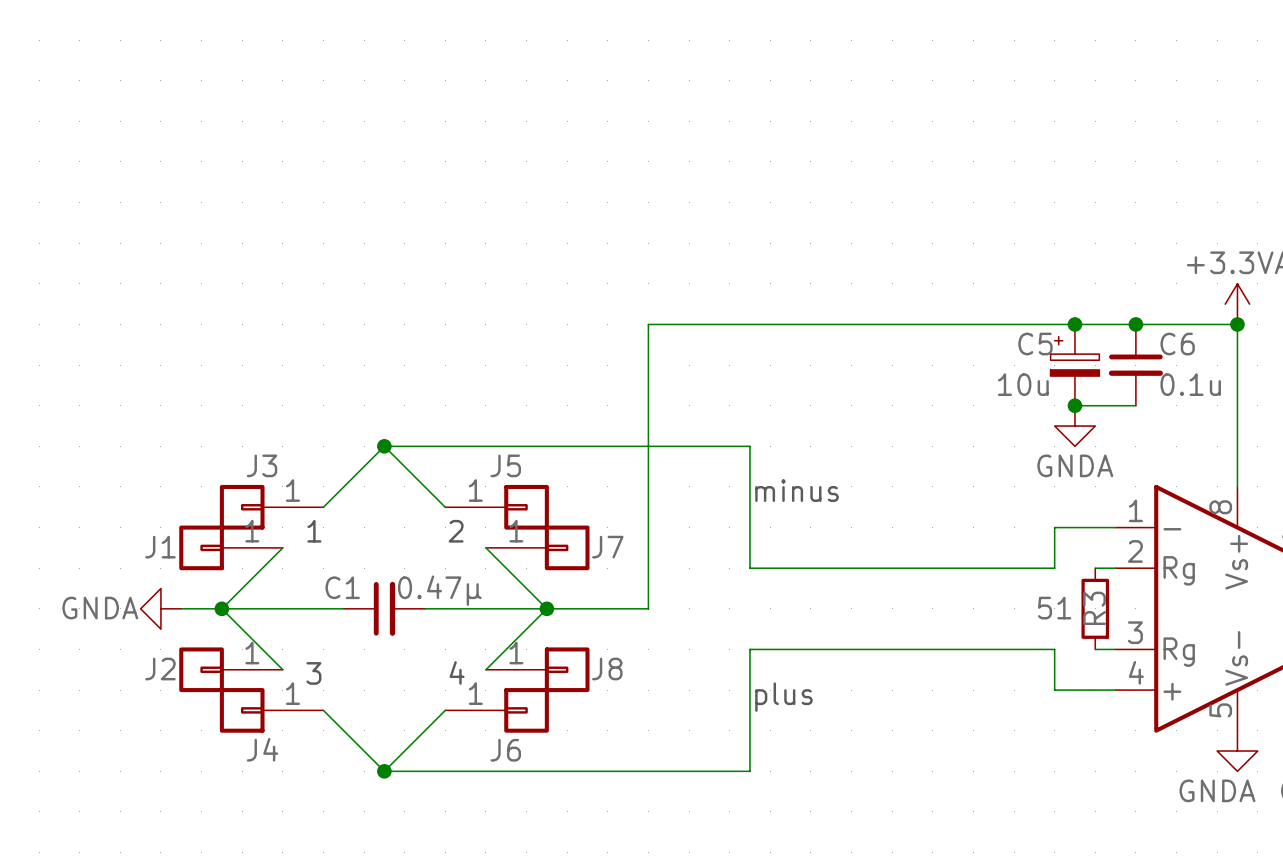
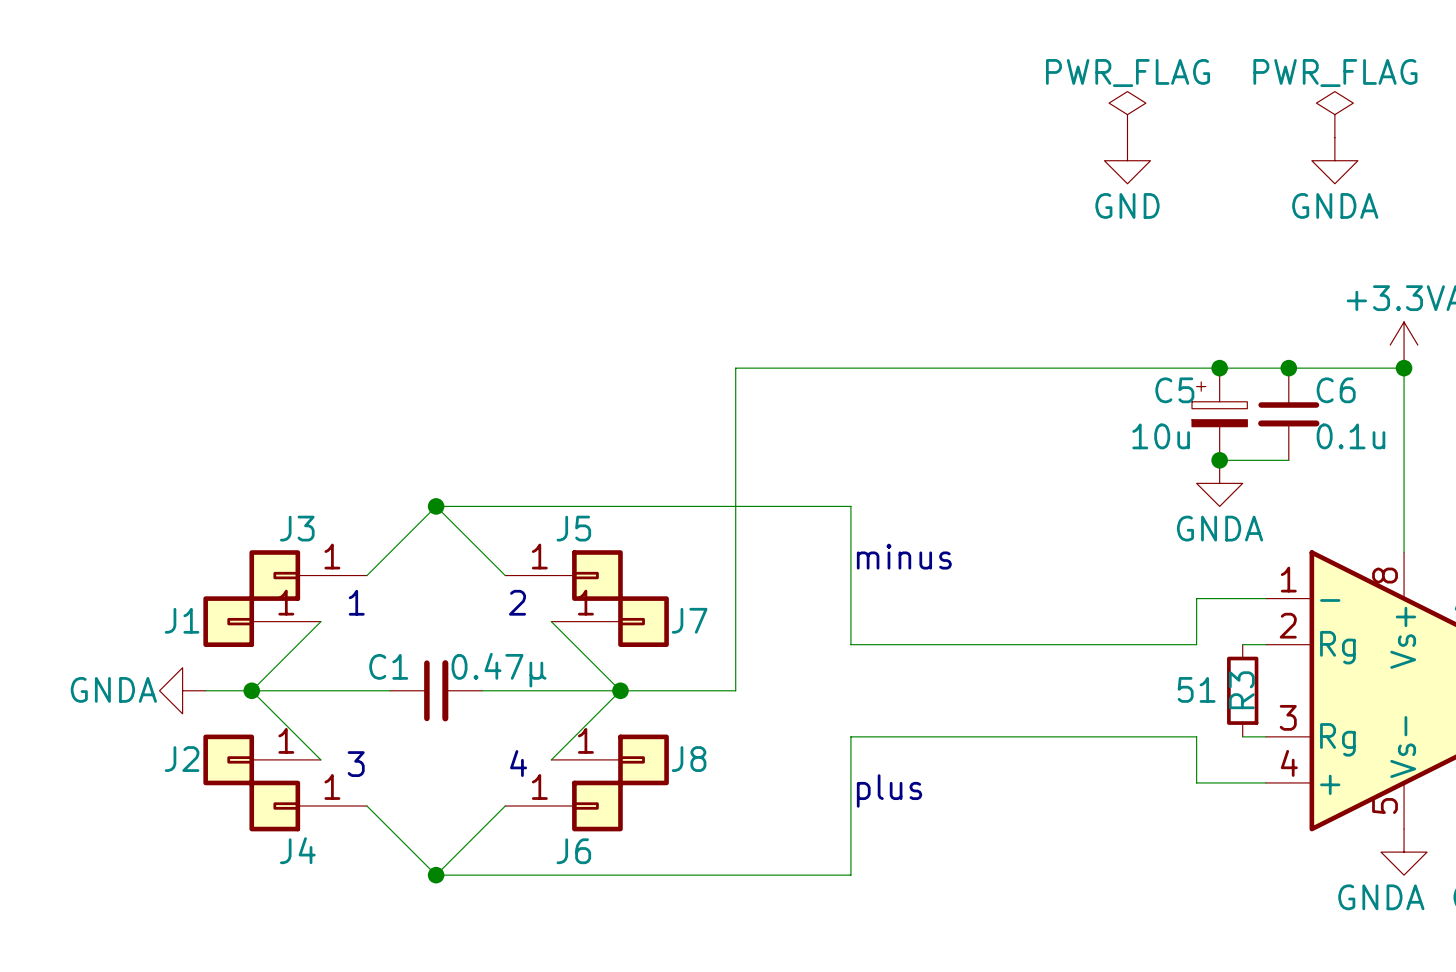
power symbol: none -> PWR_FLAG (1127, 114)
power symbol: none -> PWR_FLAG (1334, 114)
power symbol: none -> GND (1127, 160)
power symbol: none -> GNDA (1334, 160)

